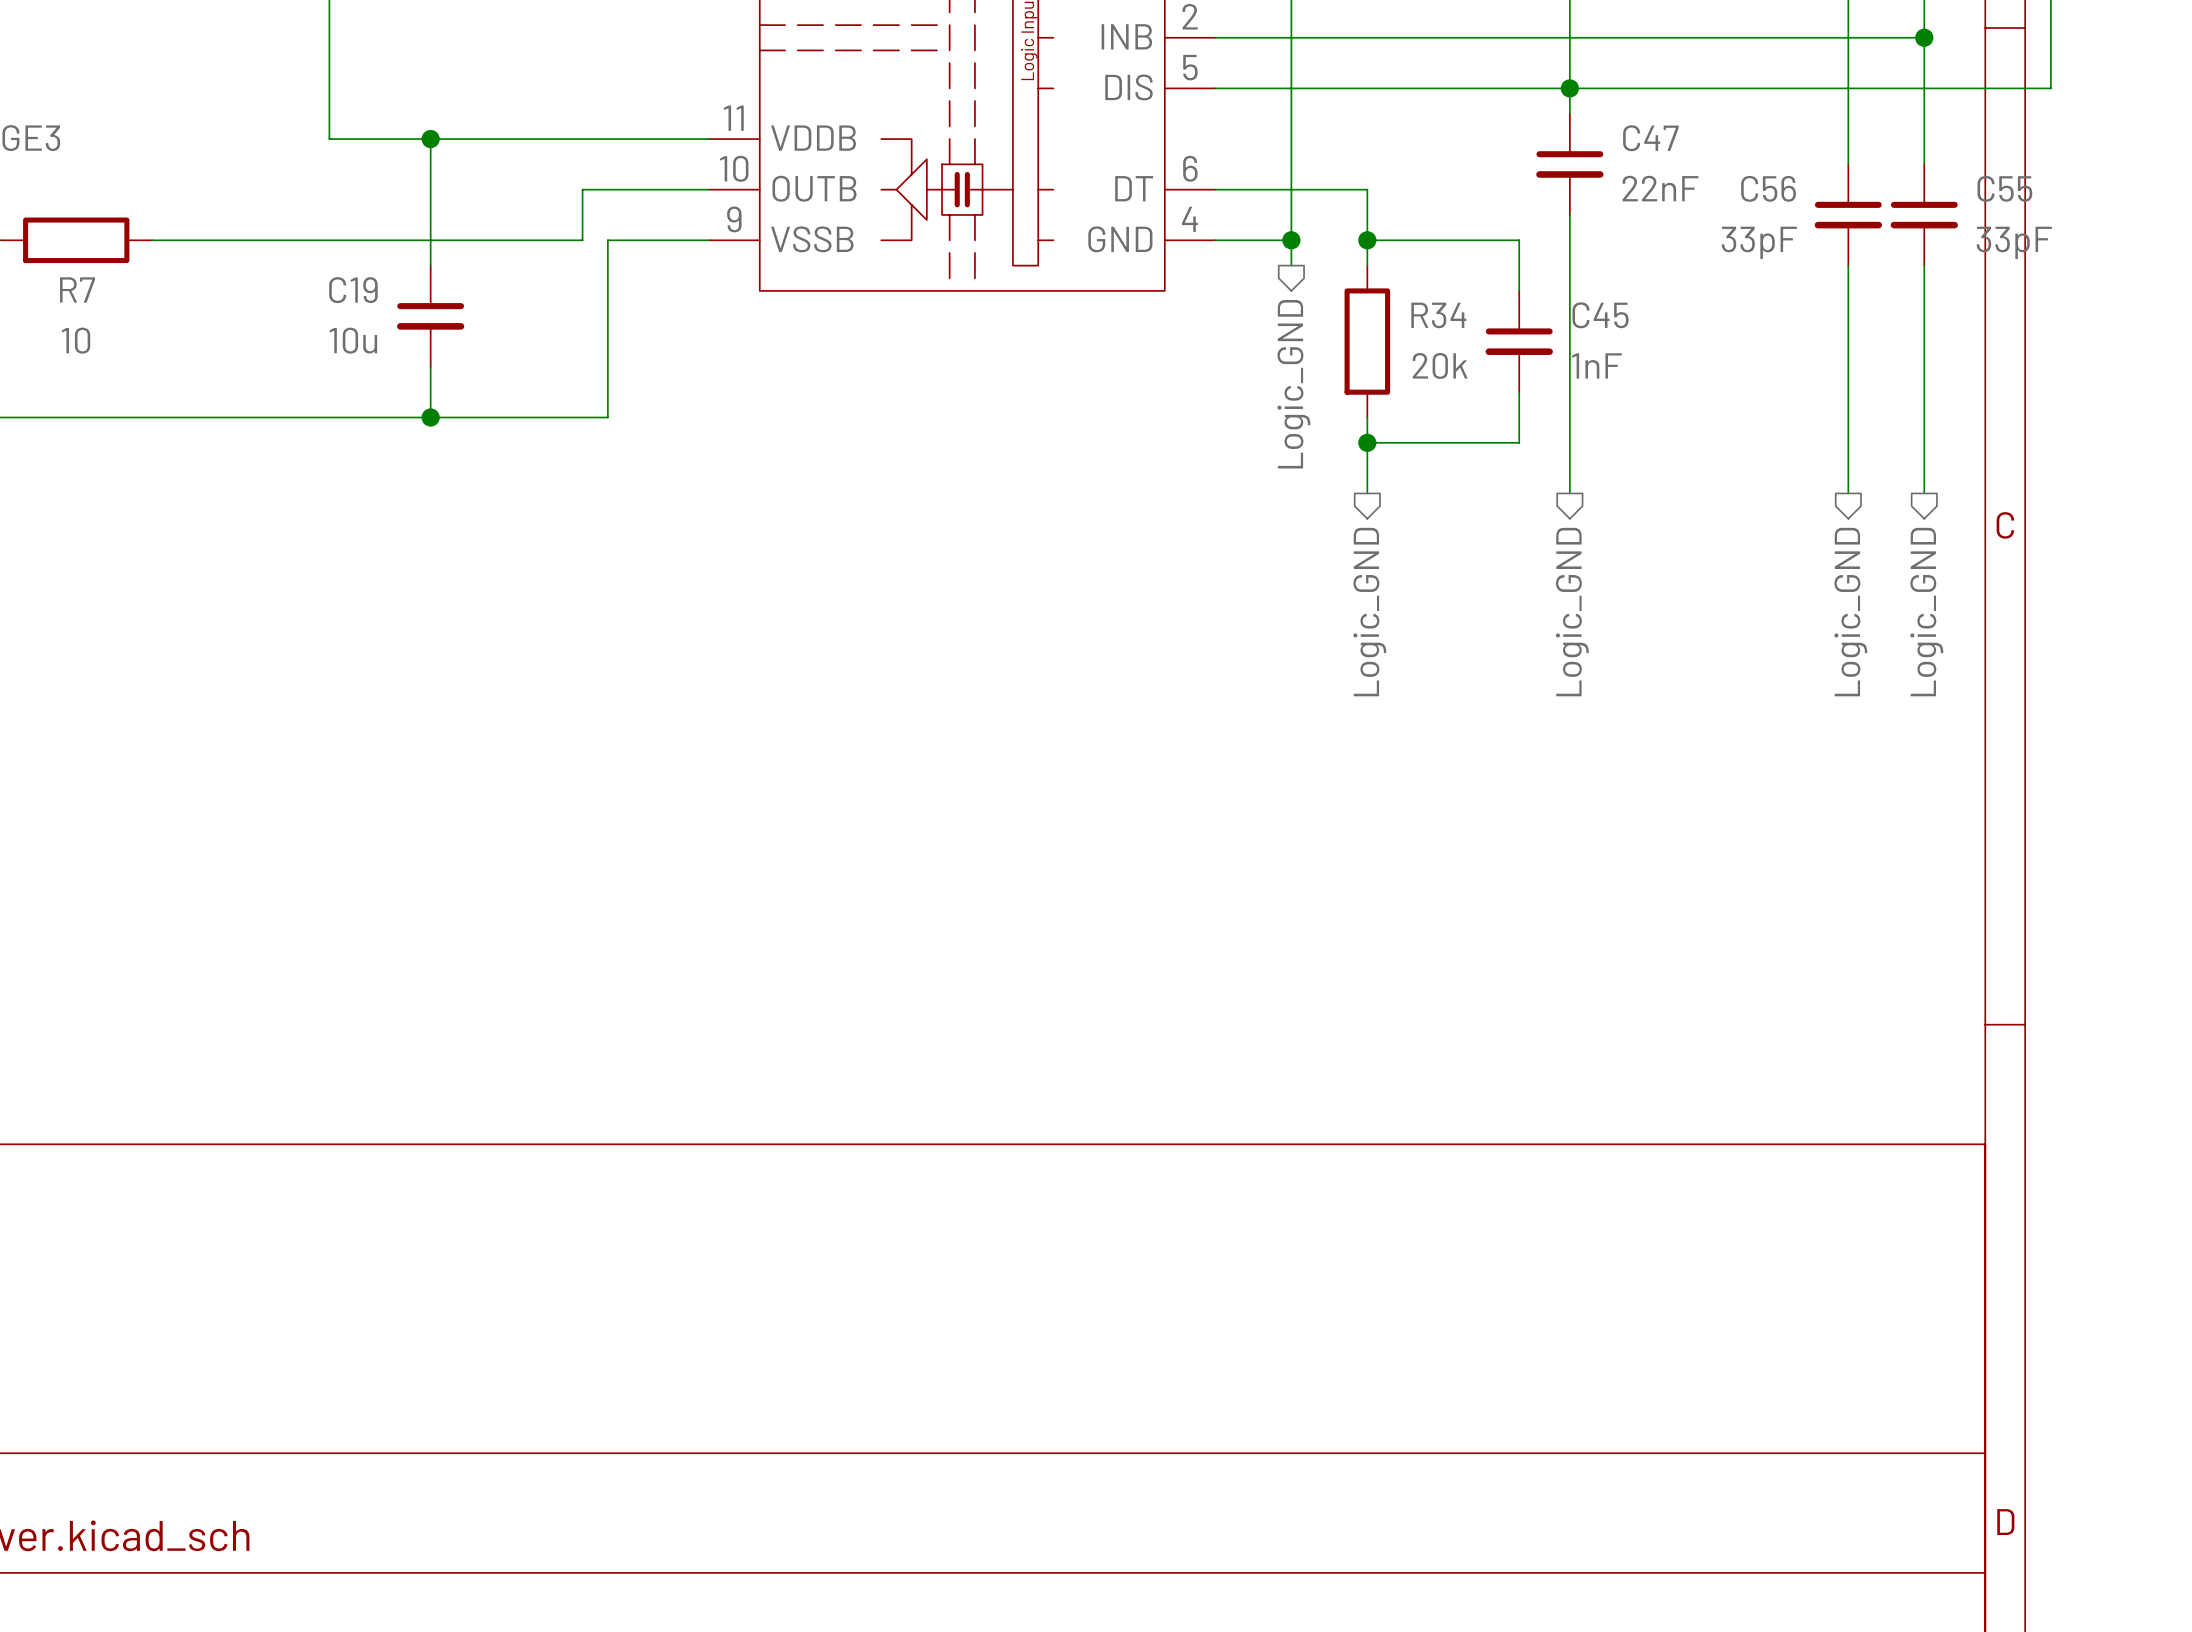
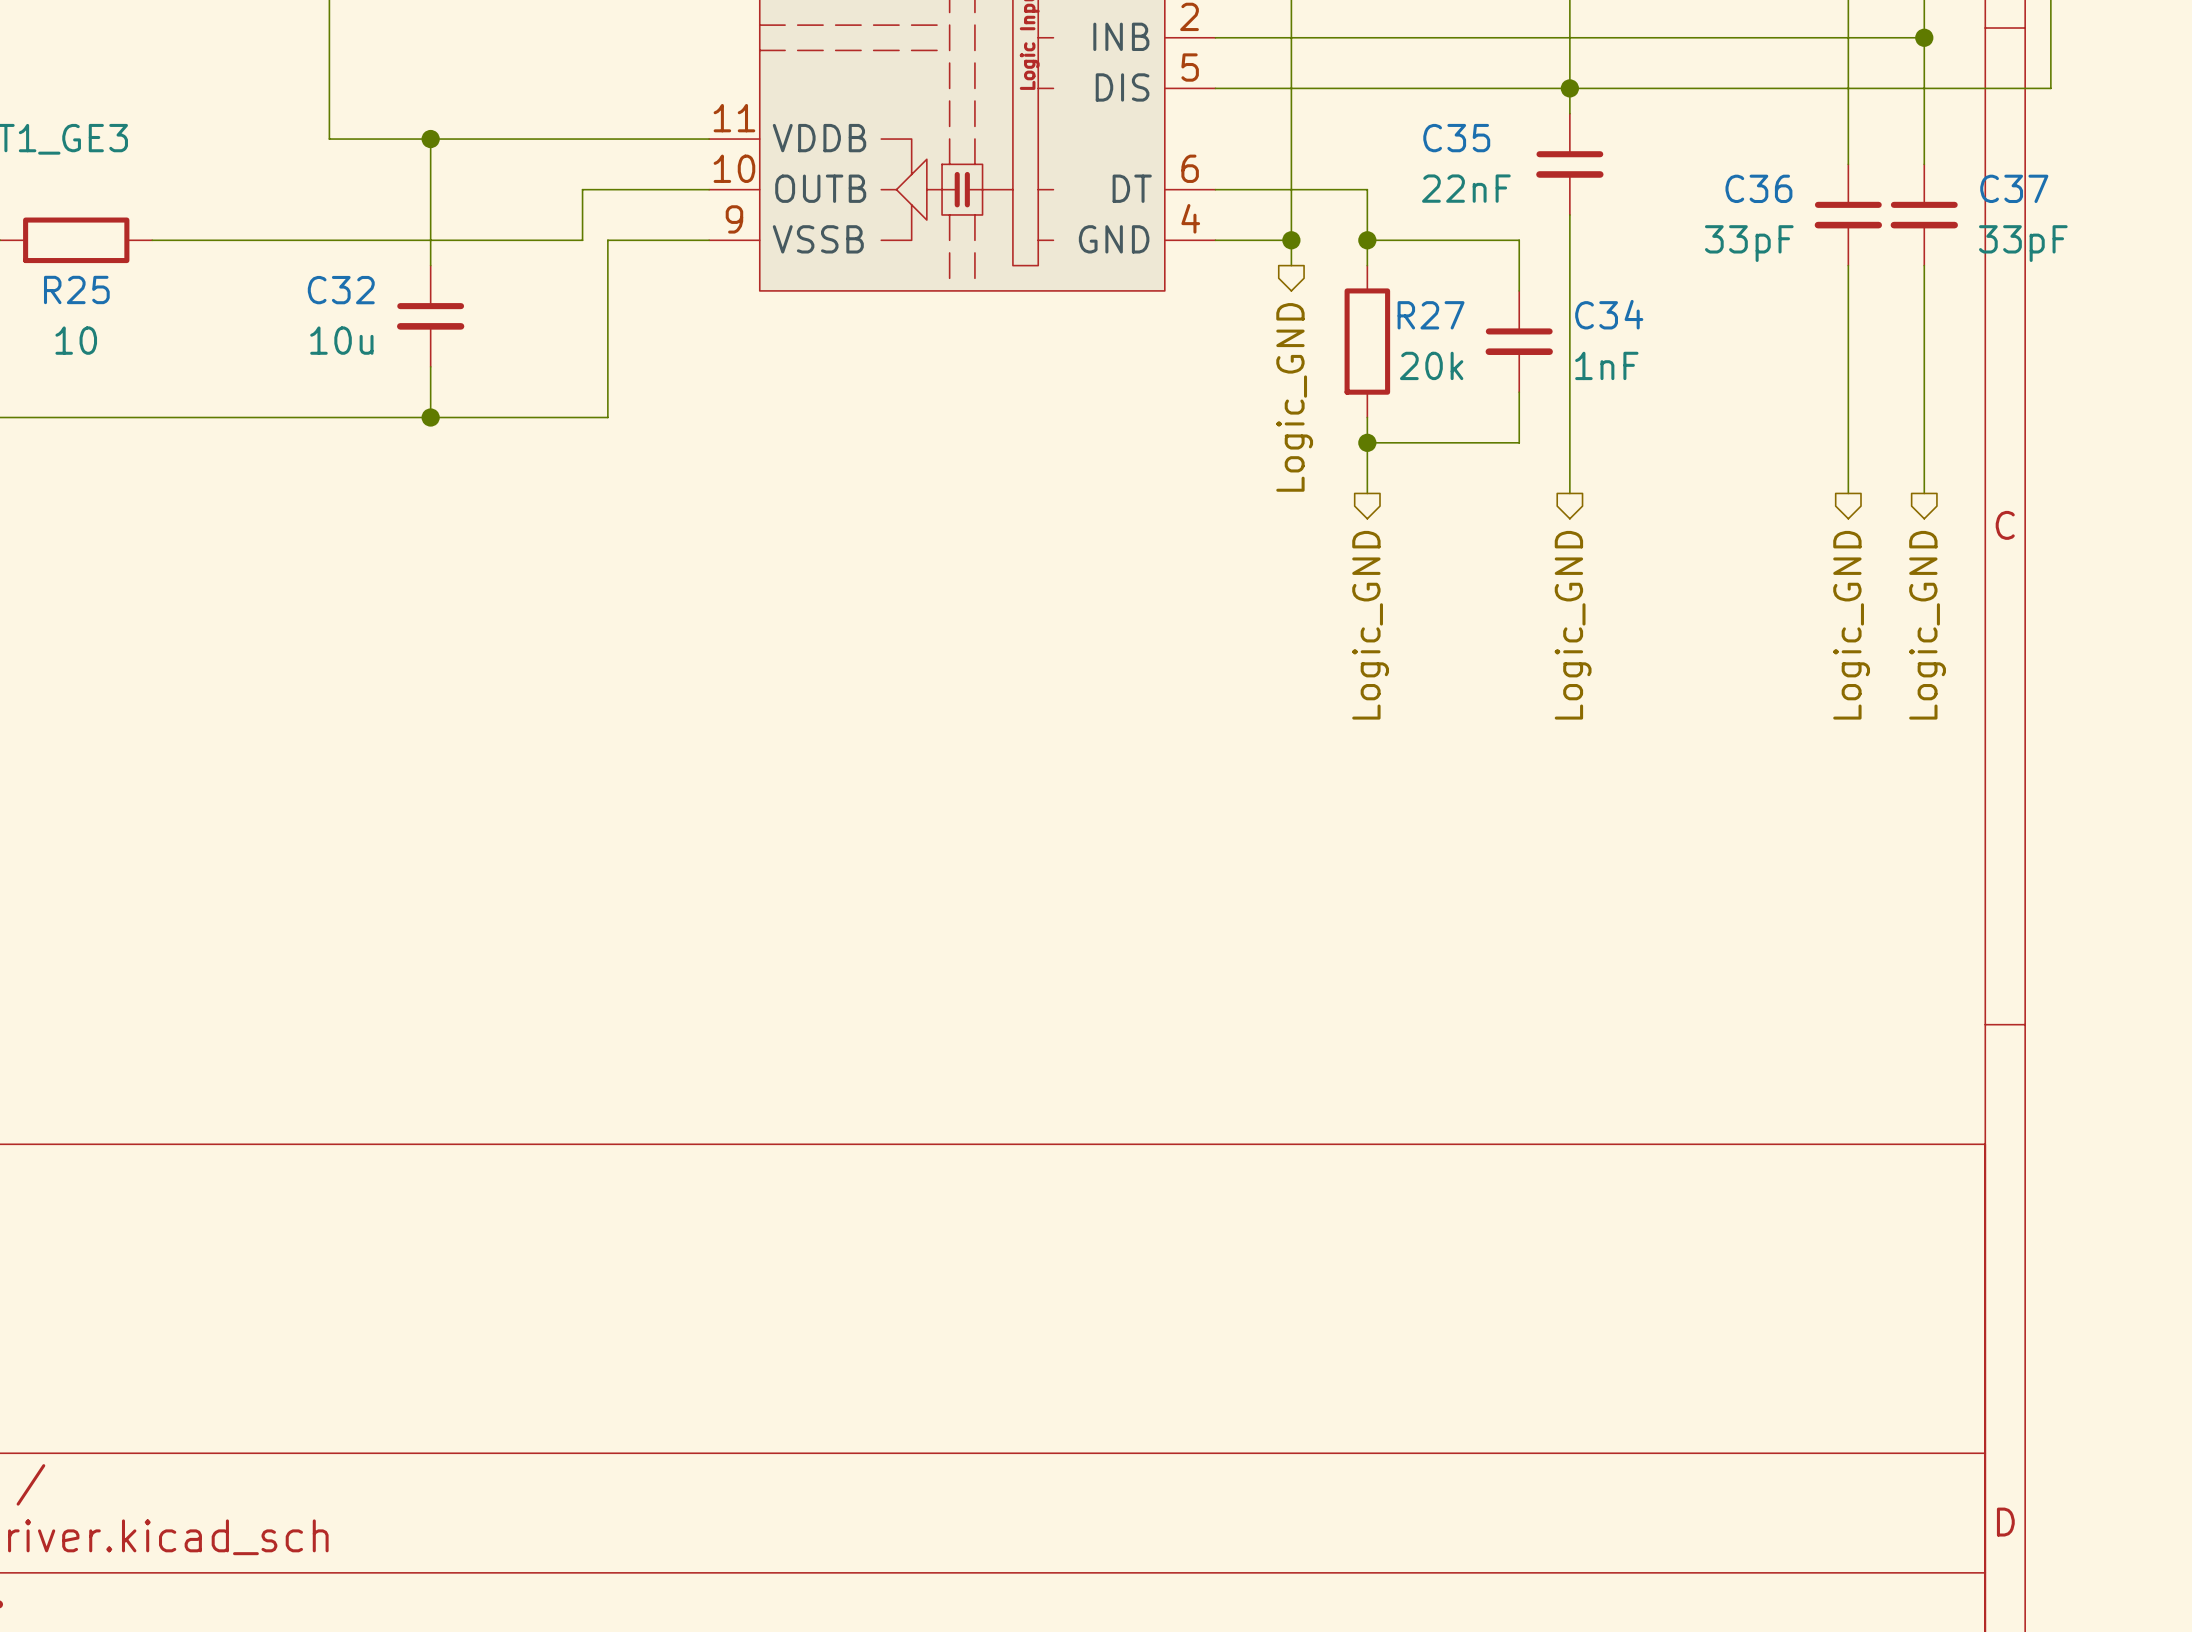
C47 name: C47 (1650, 138) -> C35 (1456, 138)
C47 value position: 22nF (1660, 188) -> 22nF (1466, 188)
C56 name: C56 (1768, 188) -> C36 (1758, 188)
C55 name: C55 (2004, 188) -> C37 (2014, 188)
R7 name: R7 (77, 289) -> R25 (76, 289)
C19 name: C19 (353, 290) -> C32 (341, 290)
R34 name: R34 (1438, 315) -> R27 (1431, 315)
C45 name: C45 (1600, 315) -> C34 (1609, 314)

